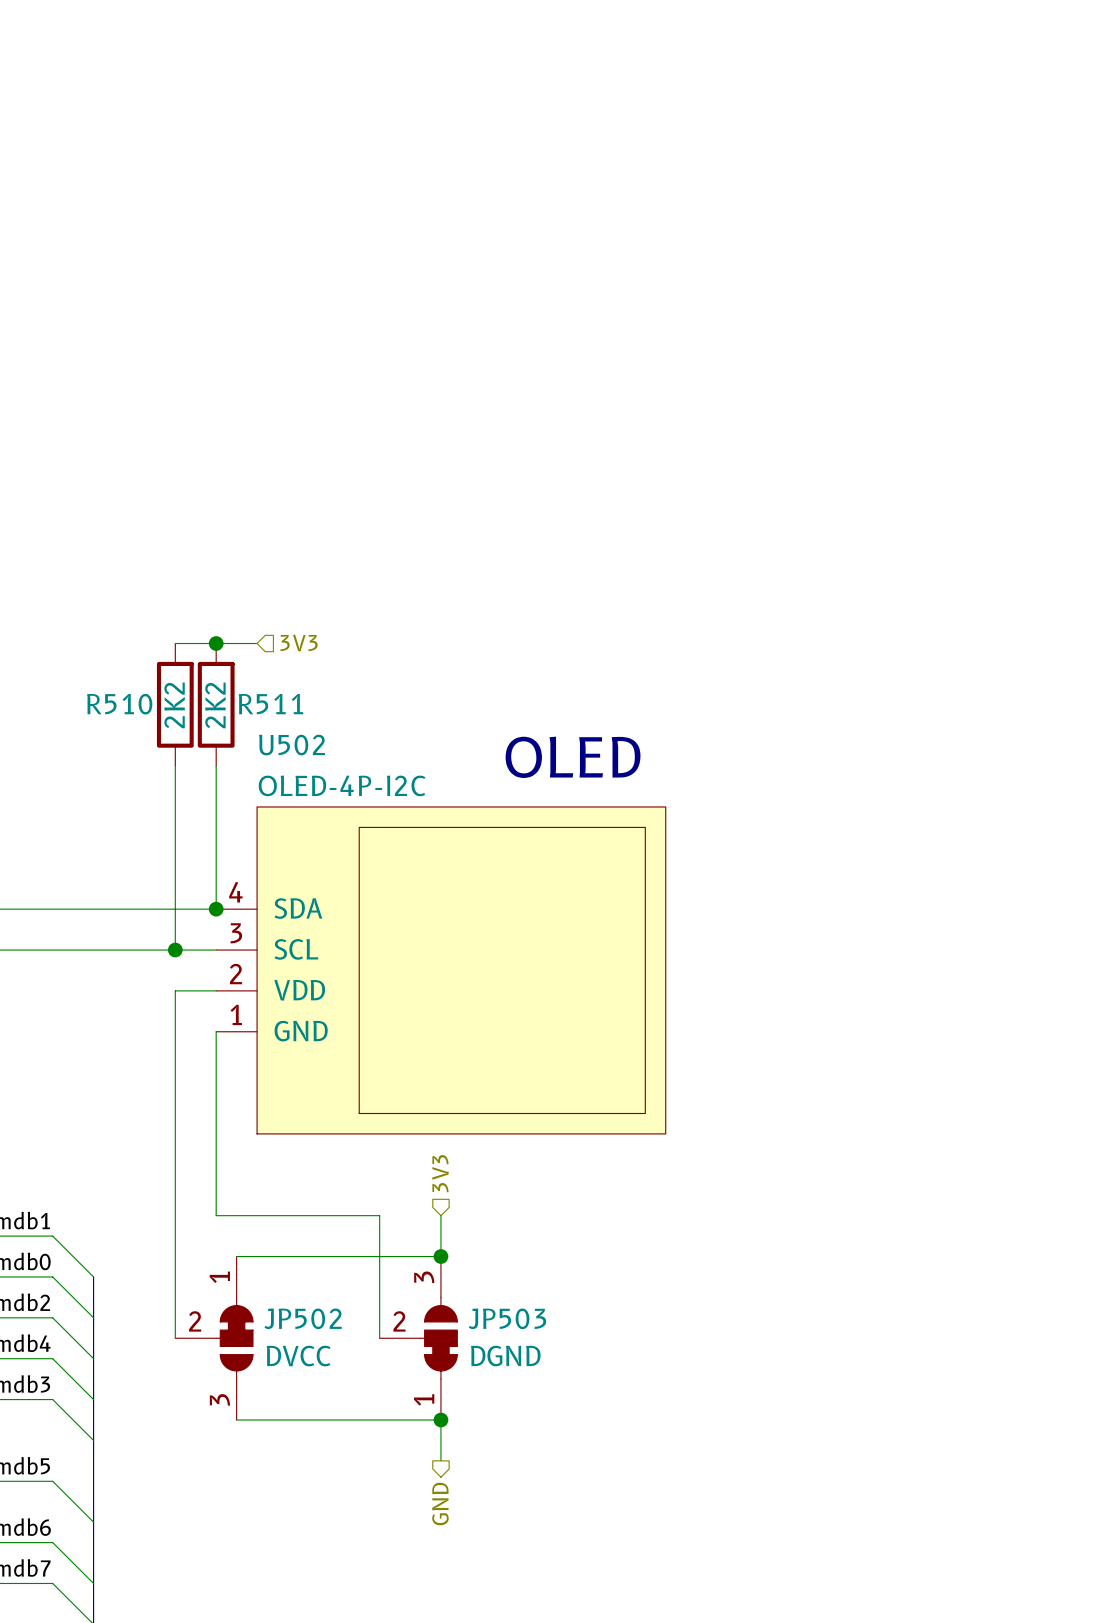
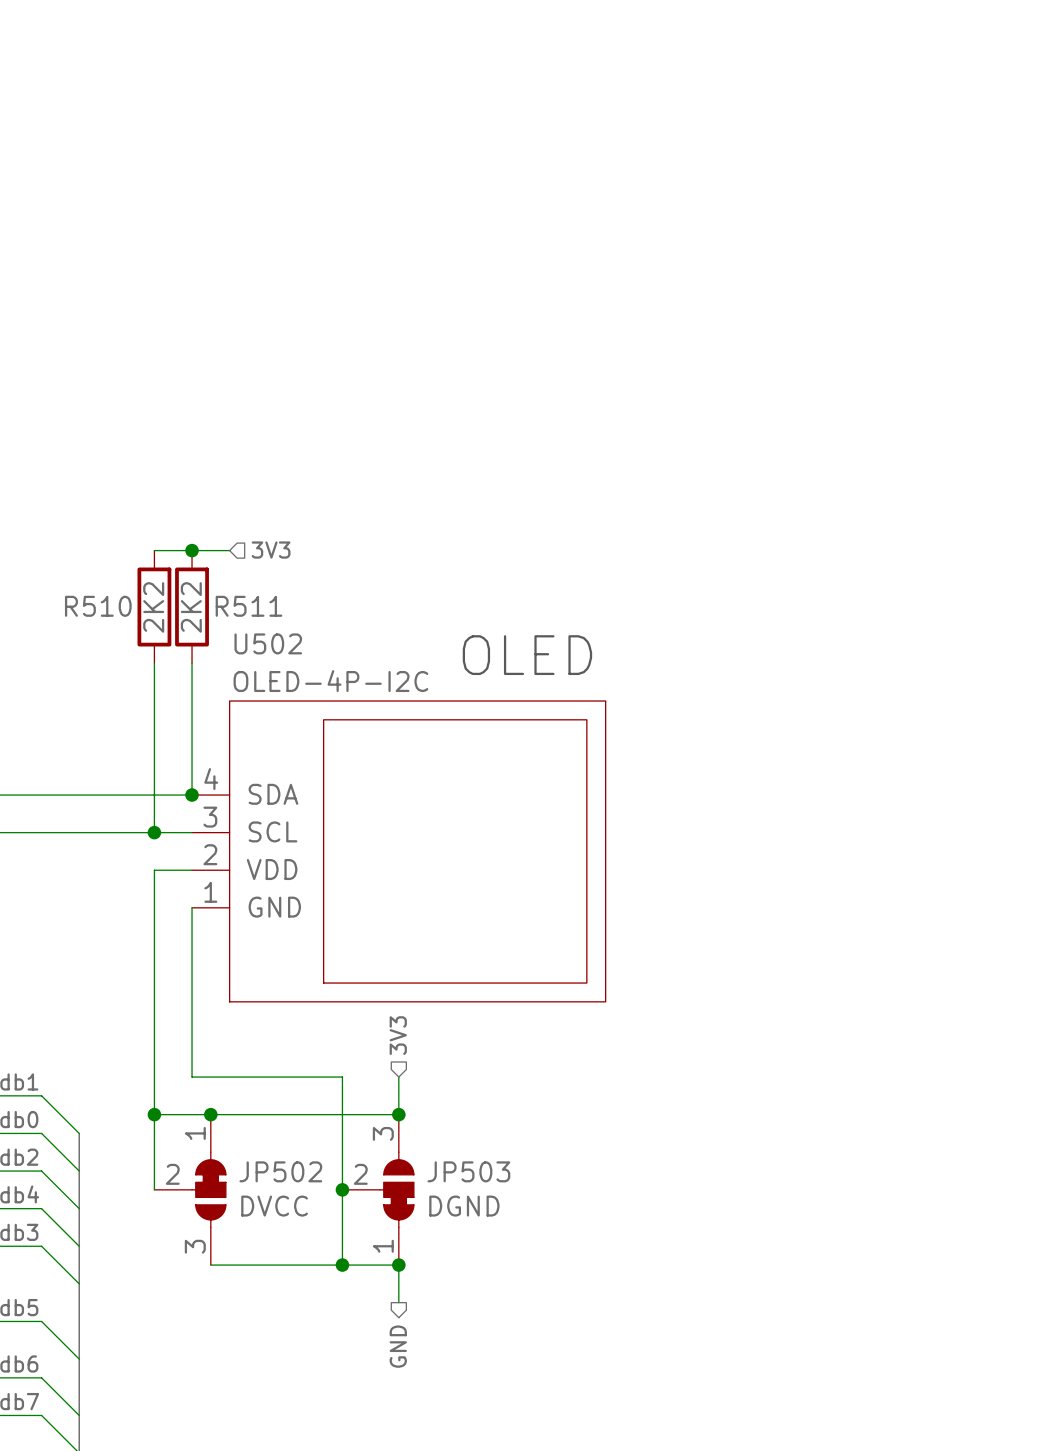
wire: none -> (154, 1114) (210, 1114)
junction: none -> (154, 1114)
junction: none -> (210, 1114)
wire: none -> (342, 1189) (342, 1265)
junction: none -> (342, 1189)
junction: none -> (342, 1265)

